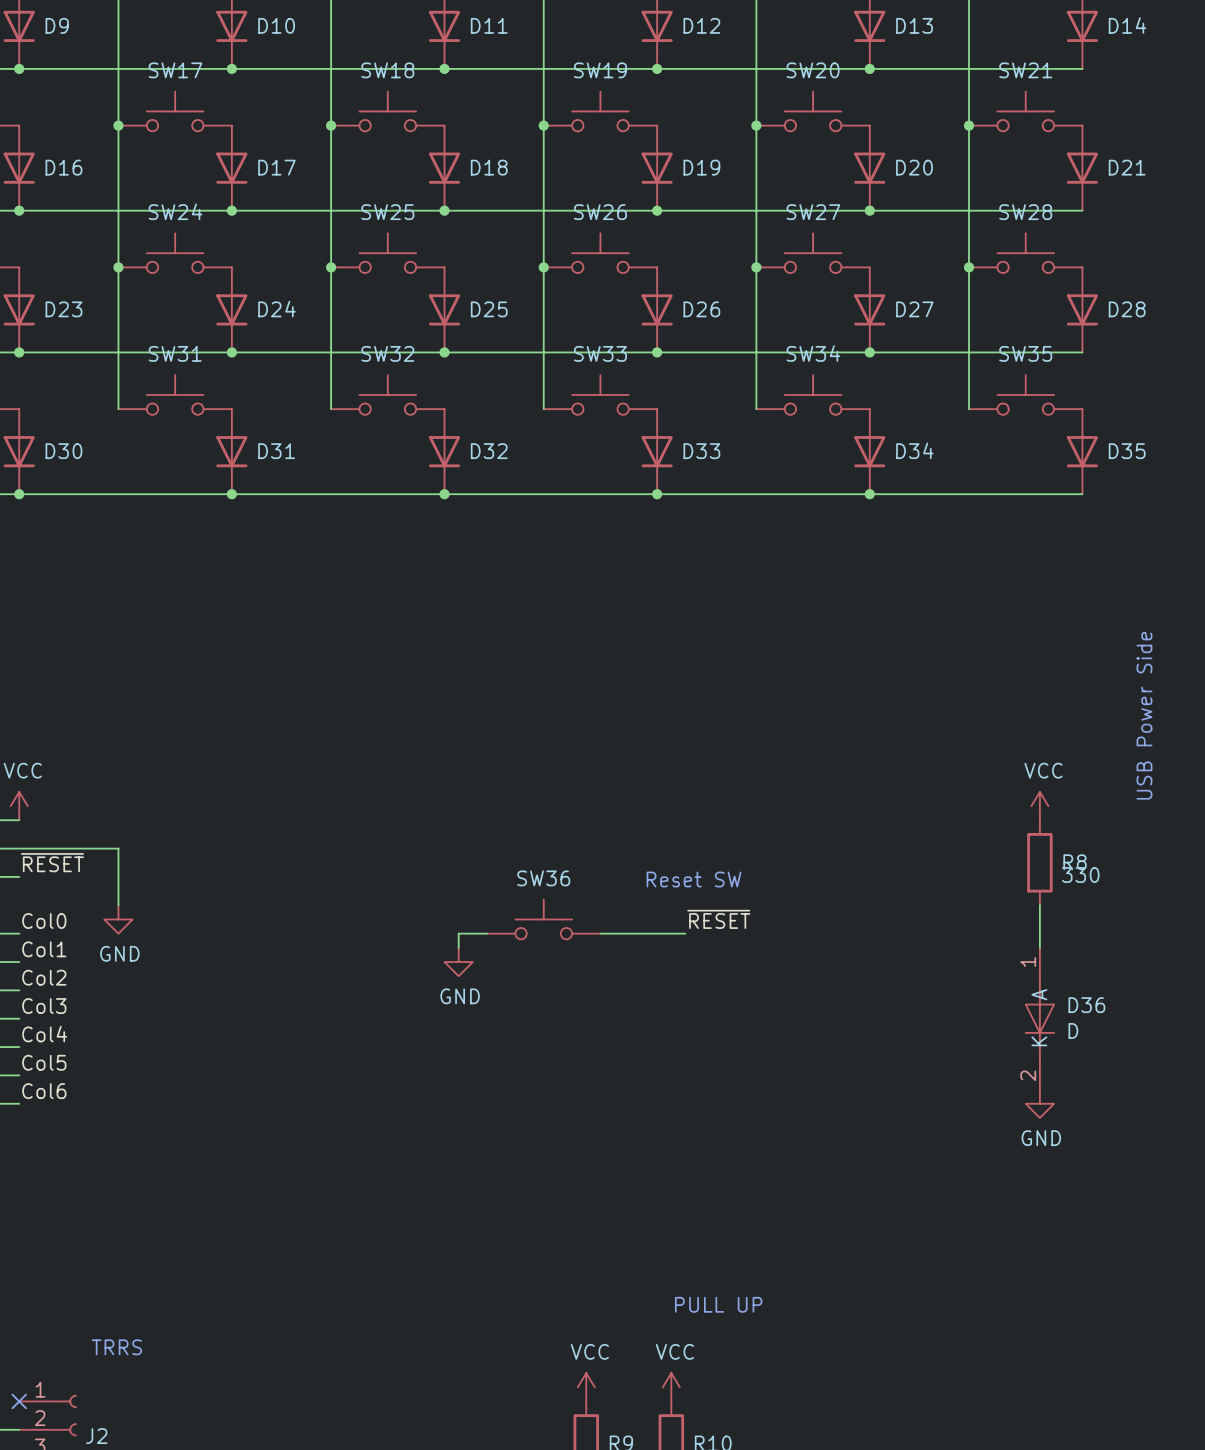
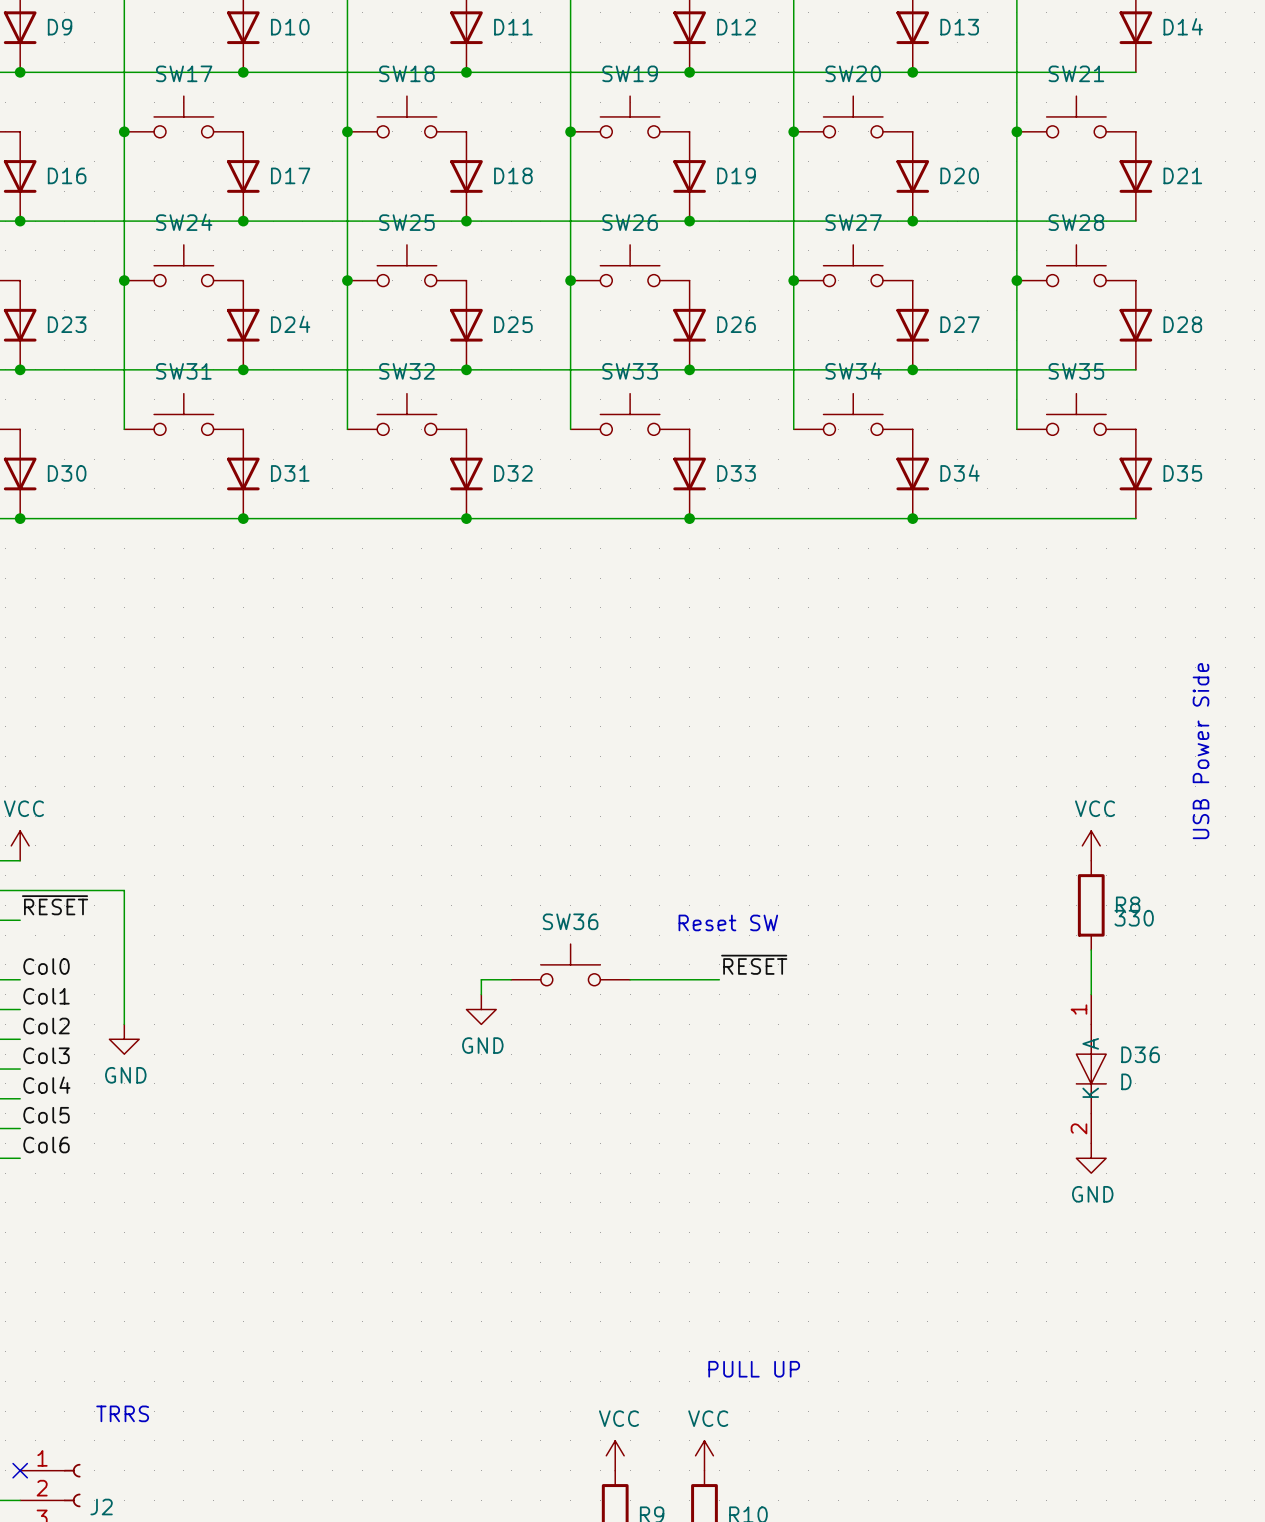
wire: none -> (124, 950) (124, 1024)
power symbol position: GND (118, 919) -> GND (124, 1039)

